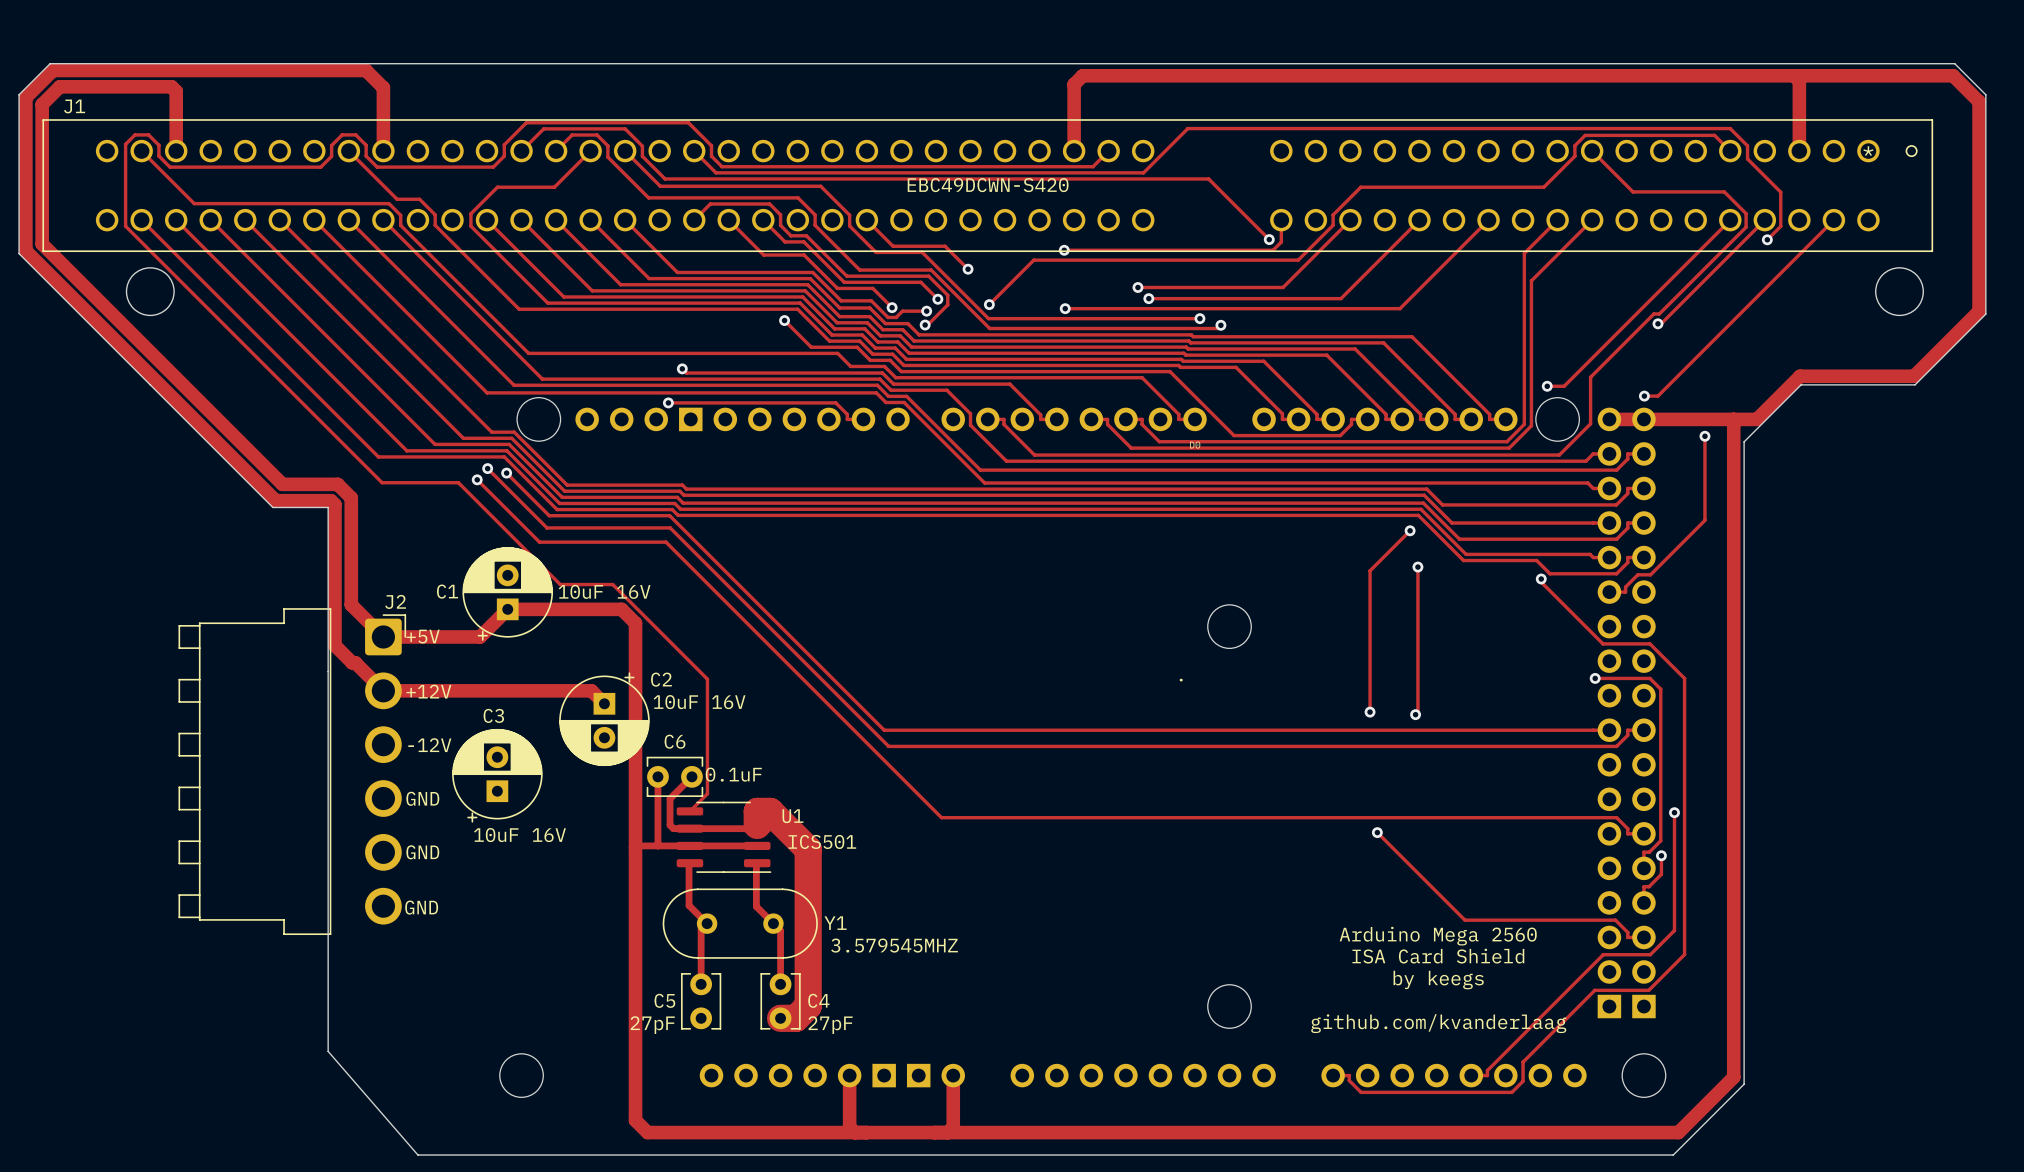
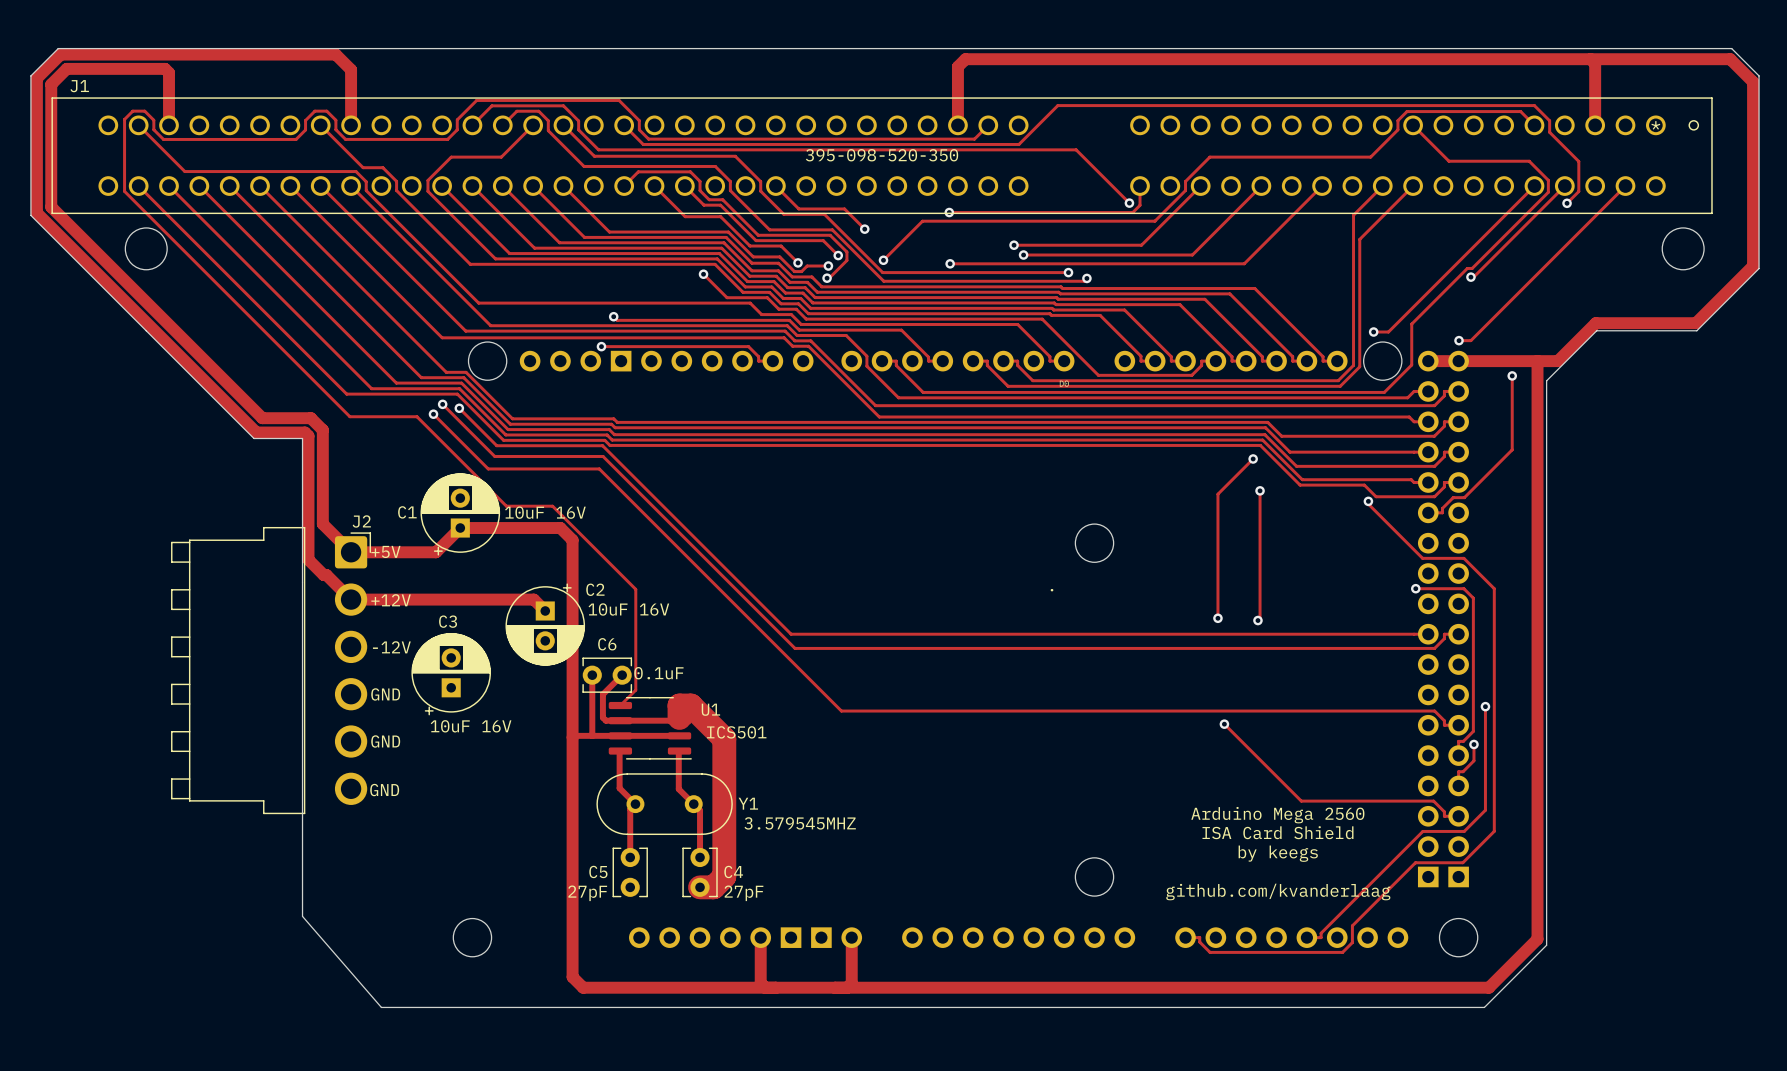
J1 value: EBC49DCWN-S420 (988, 185) -> 395-098-520-350 (882, 155)

